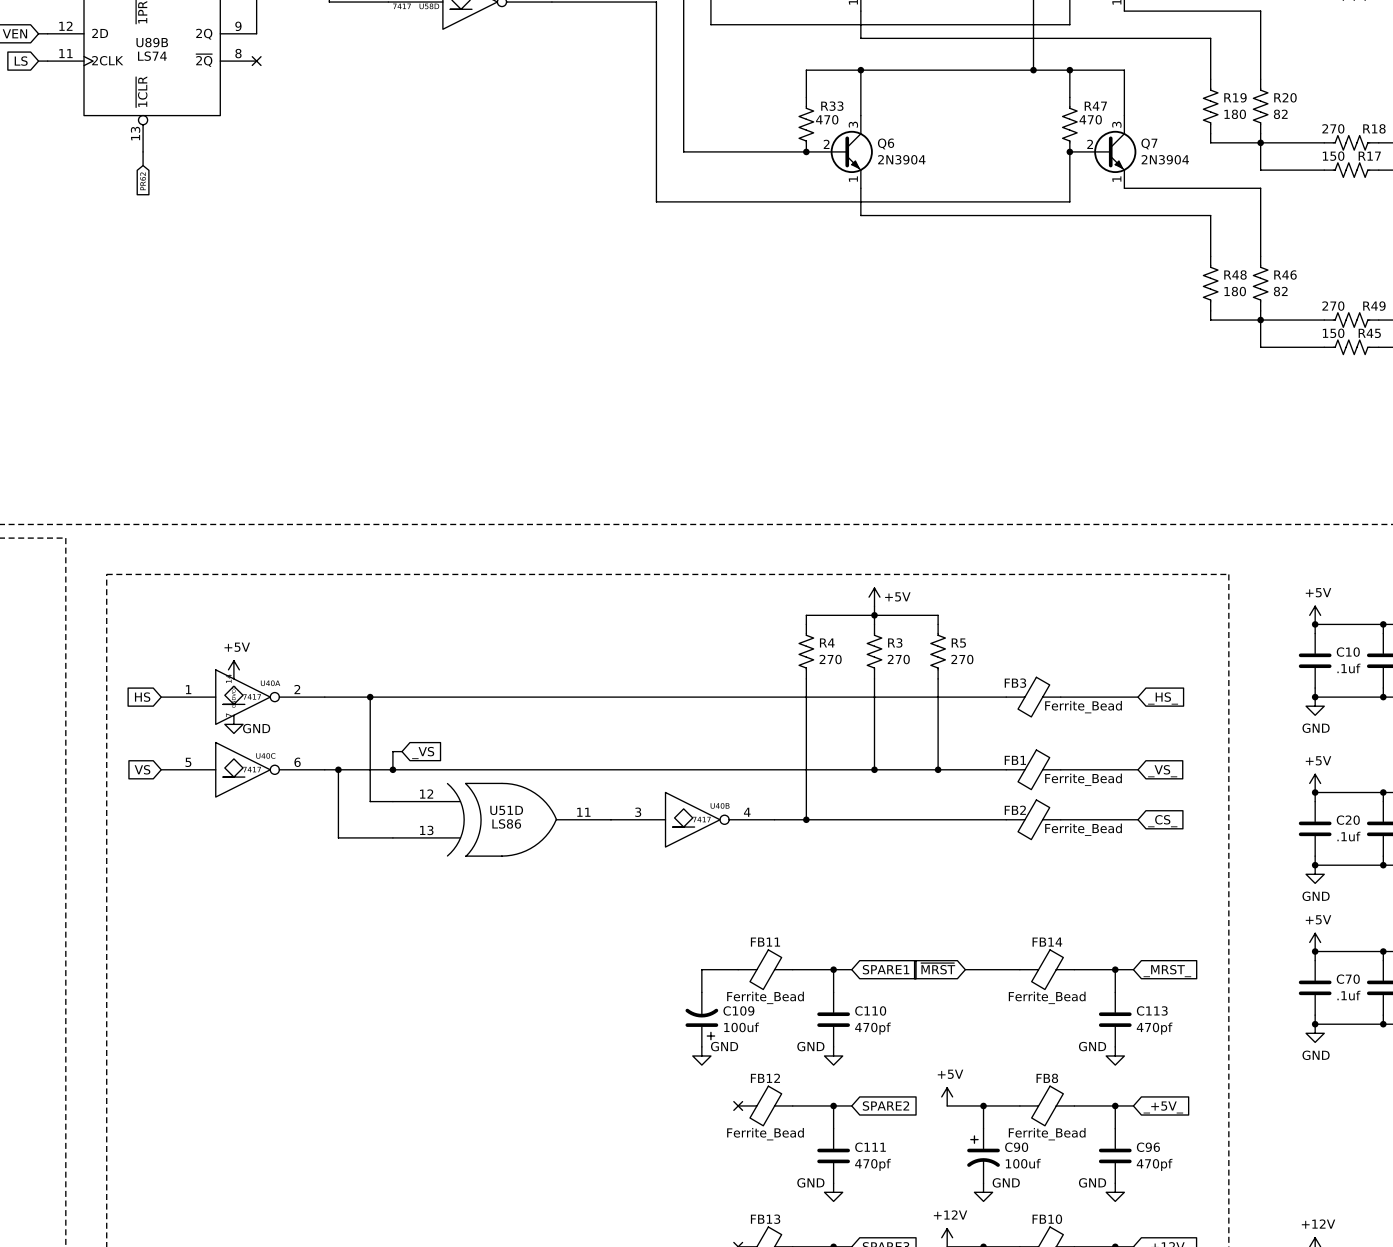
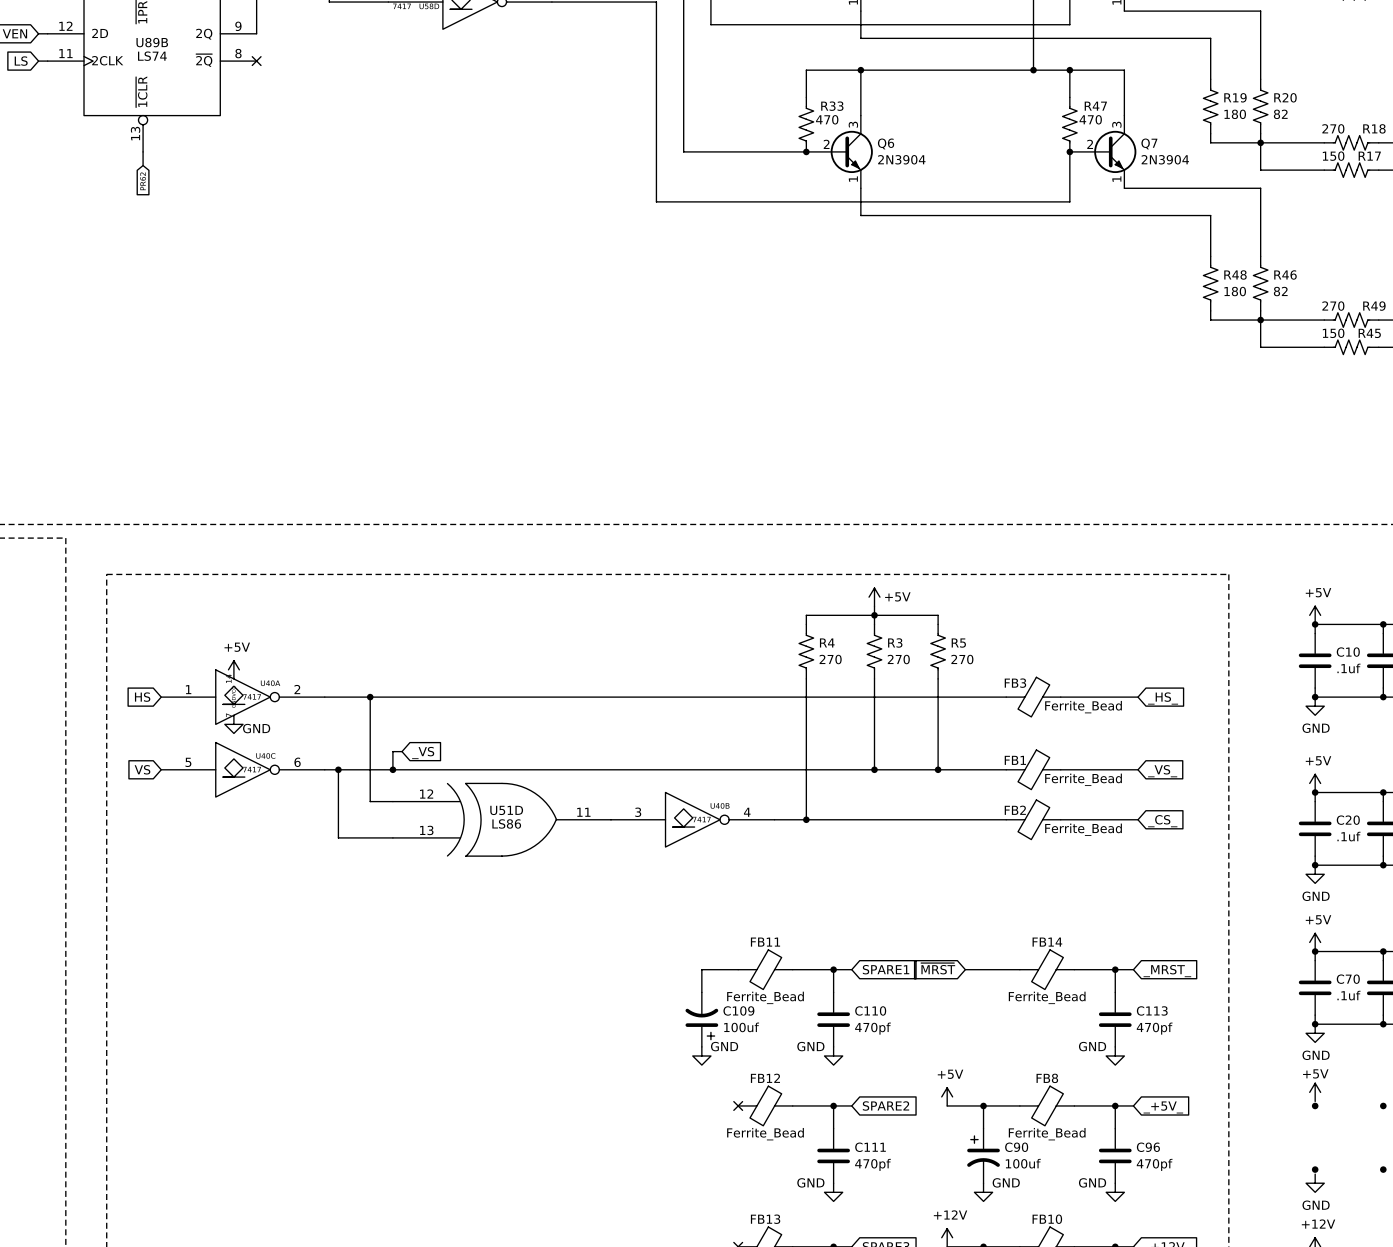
power symbol: none -> +5V (1315, 1092)
junction: none -> (1315, 1105)
junction: none -> (1383, 1105)
junction: none -> (1315, 1169)
junction: none -> (1383, 1169)
power symbol: none -> GND (1315, 1183)

